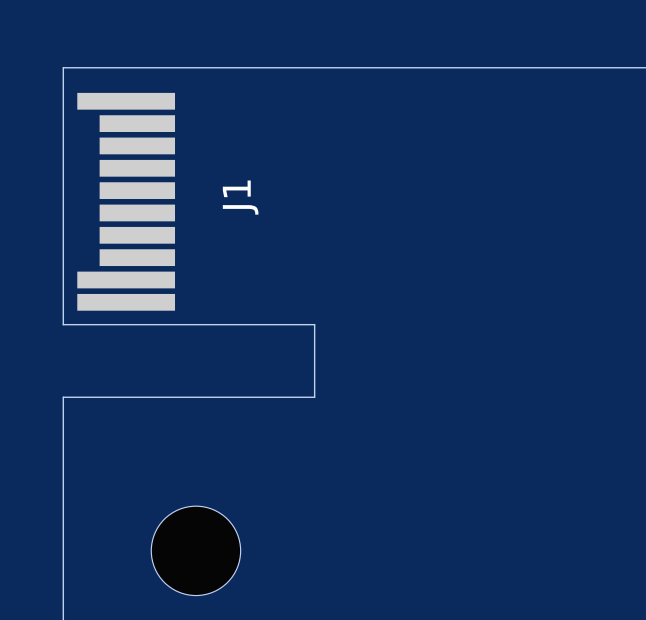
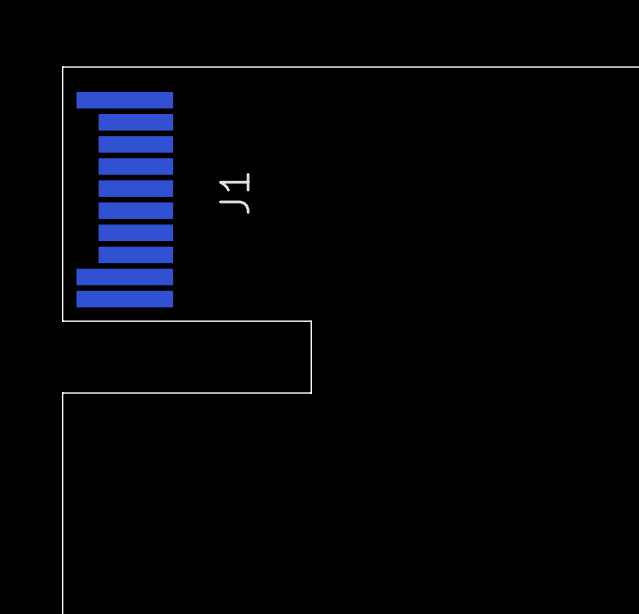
part: (195, 550) -> none

